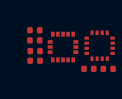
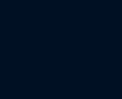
part: (34, 30) -> none
part: (34, 40) -> none
part: (99, 45) -> none
part: (63, 47) -> none
part: (35, 51) -> none
part: (35, 60) -> none
part: (88, 68) -> none
part: (108, 68) -> none

